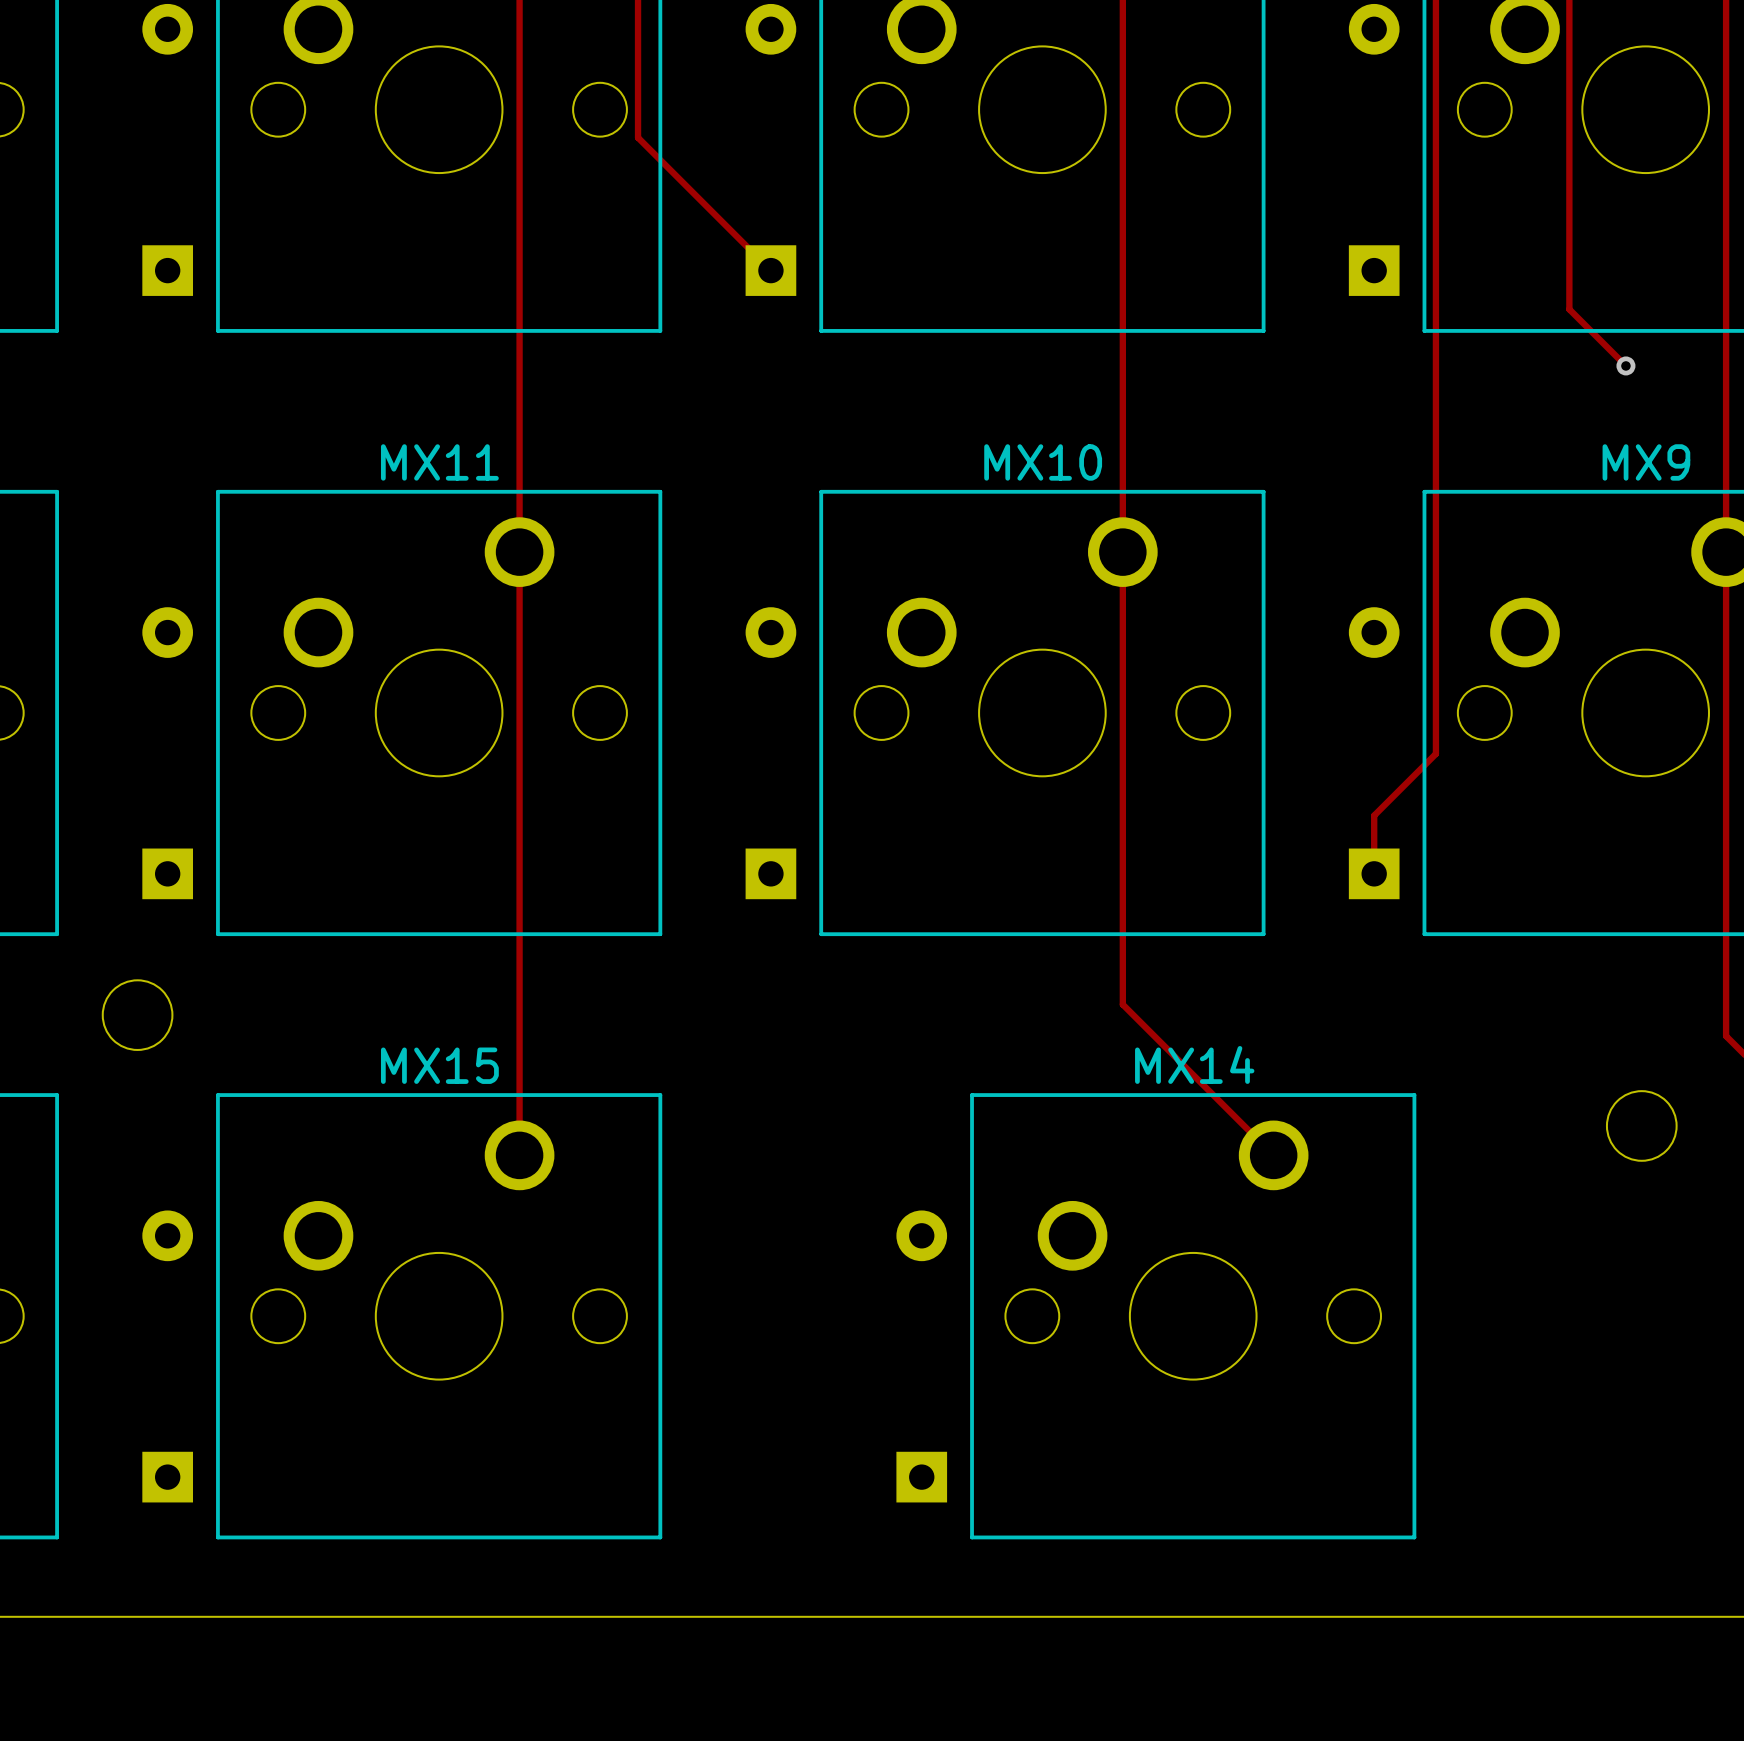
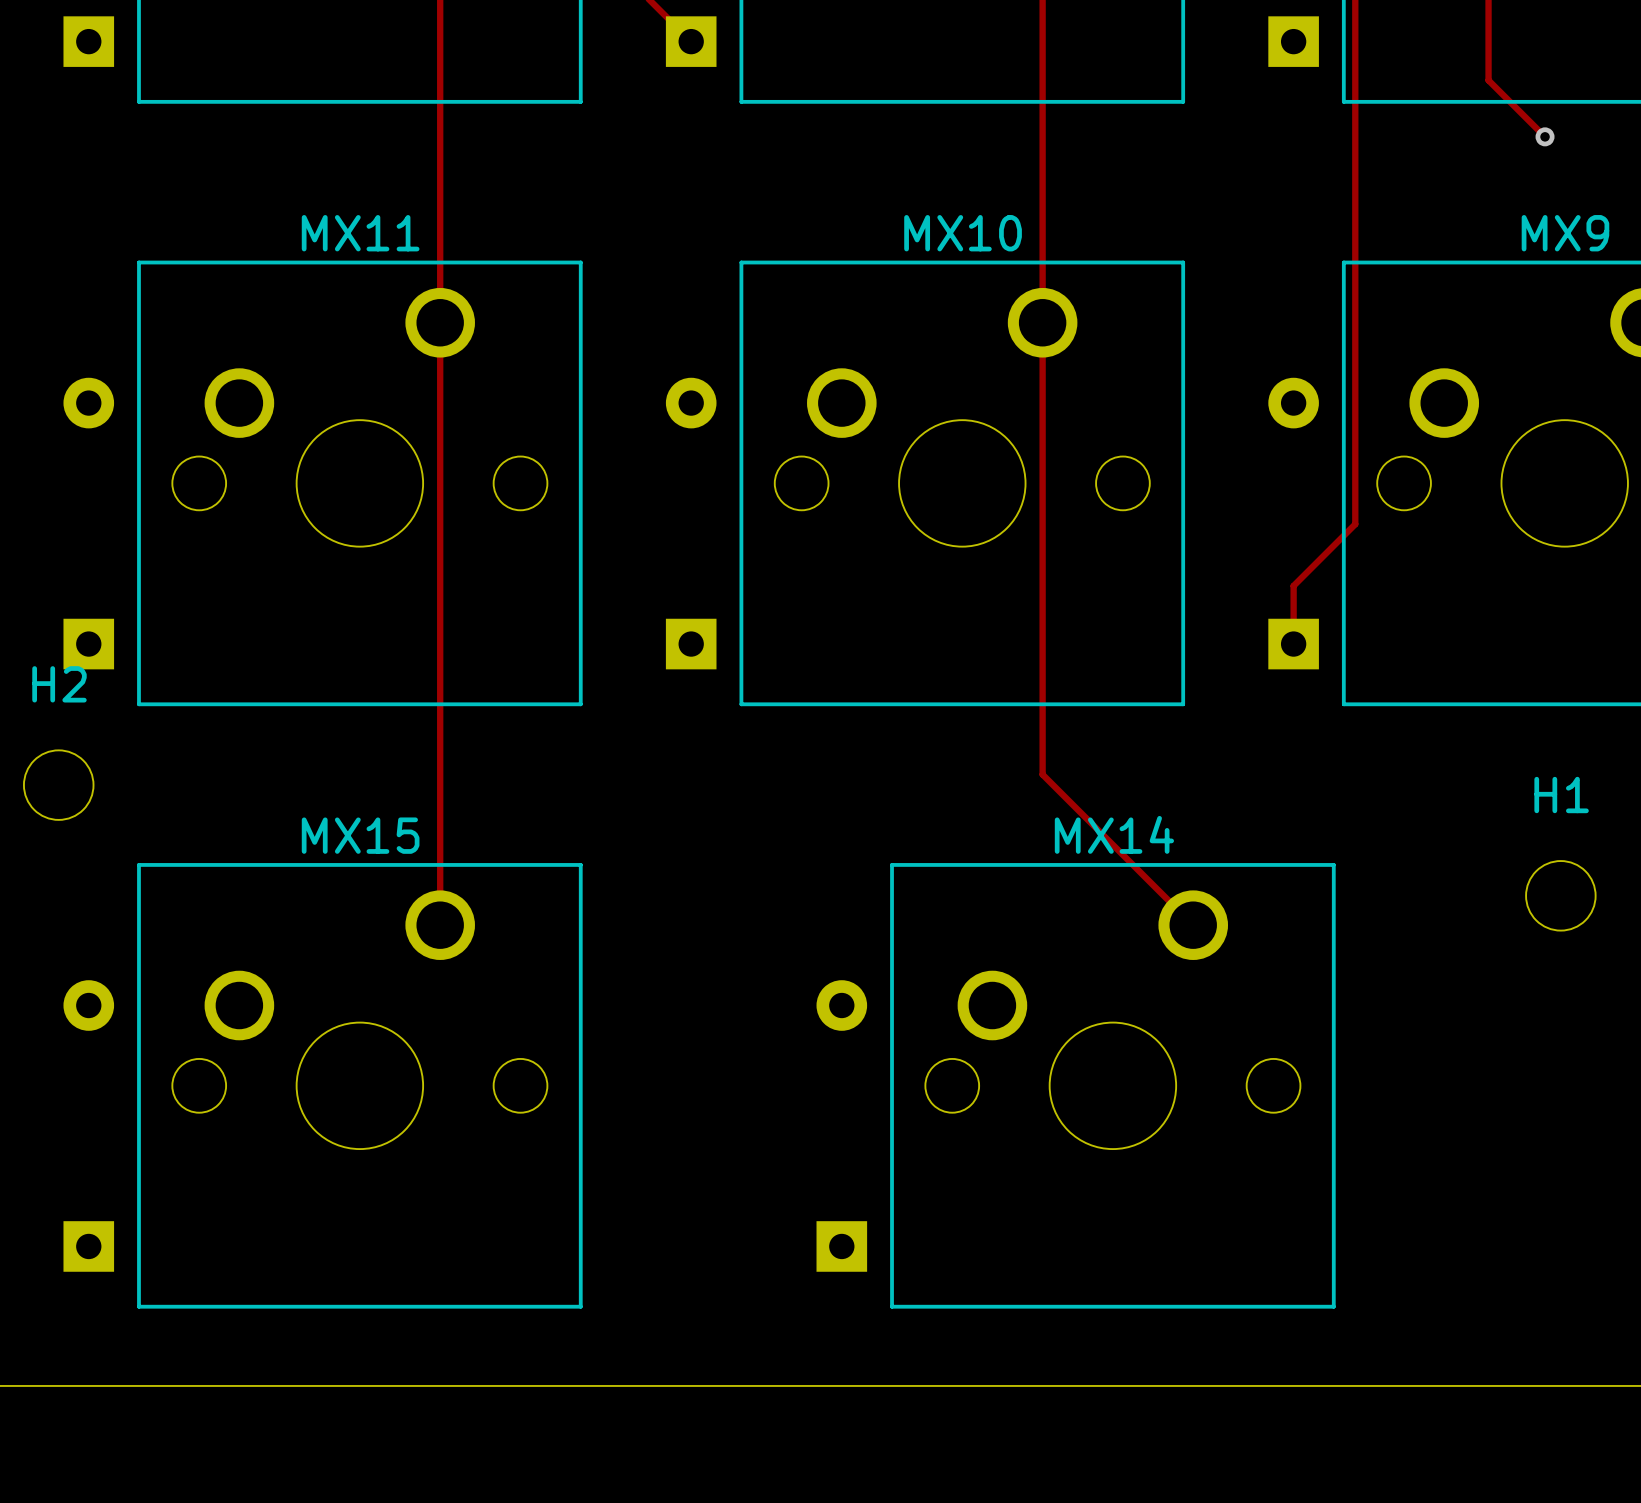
H2 name: none -> H2 (59, 684)
H1 name: none -> H1 (1561, 795)

